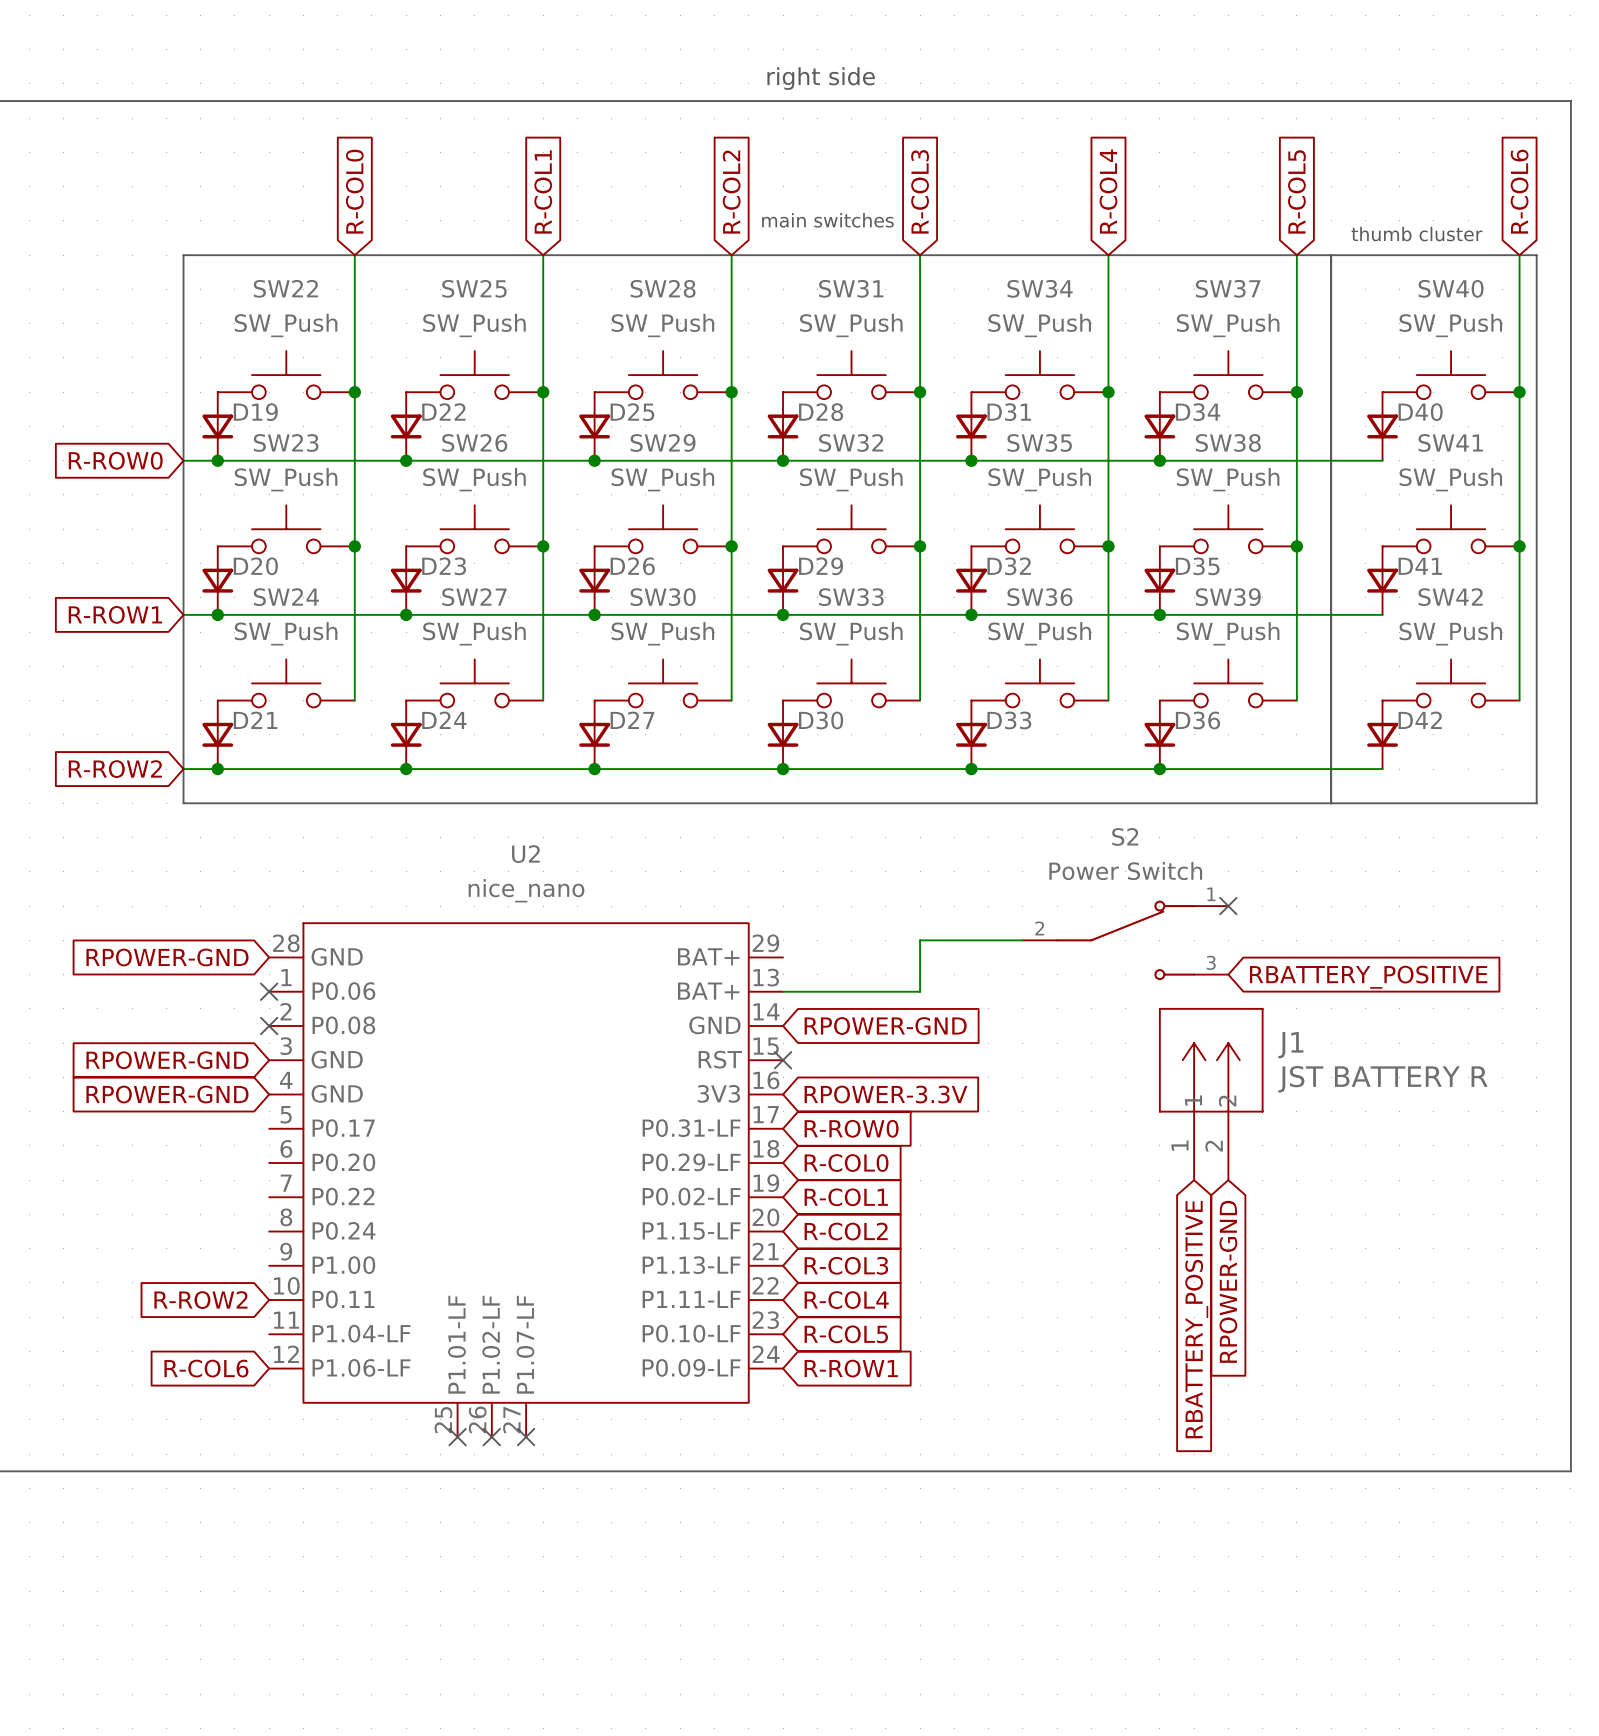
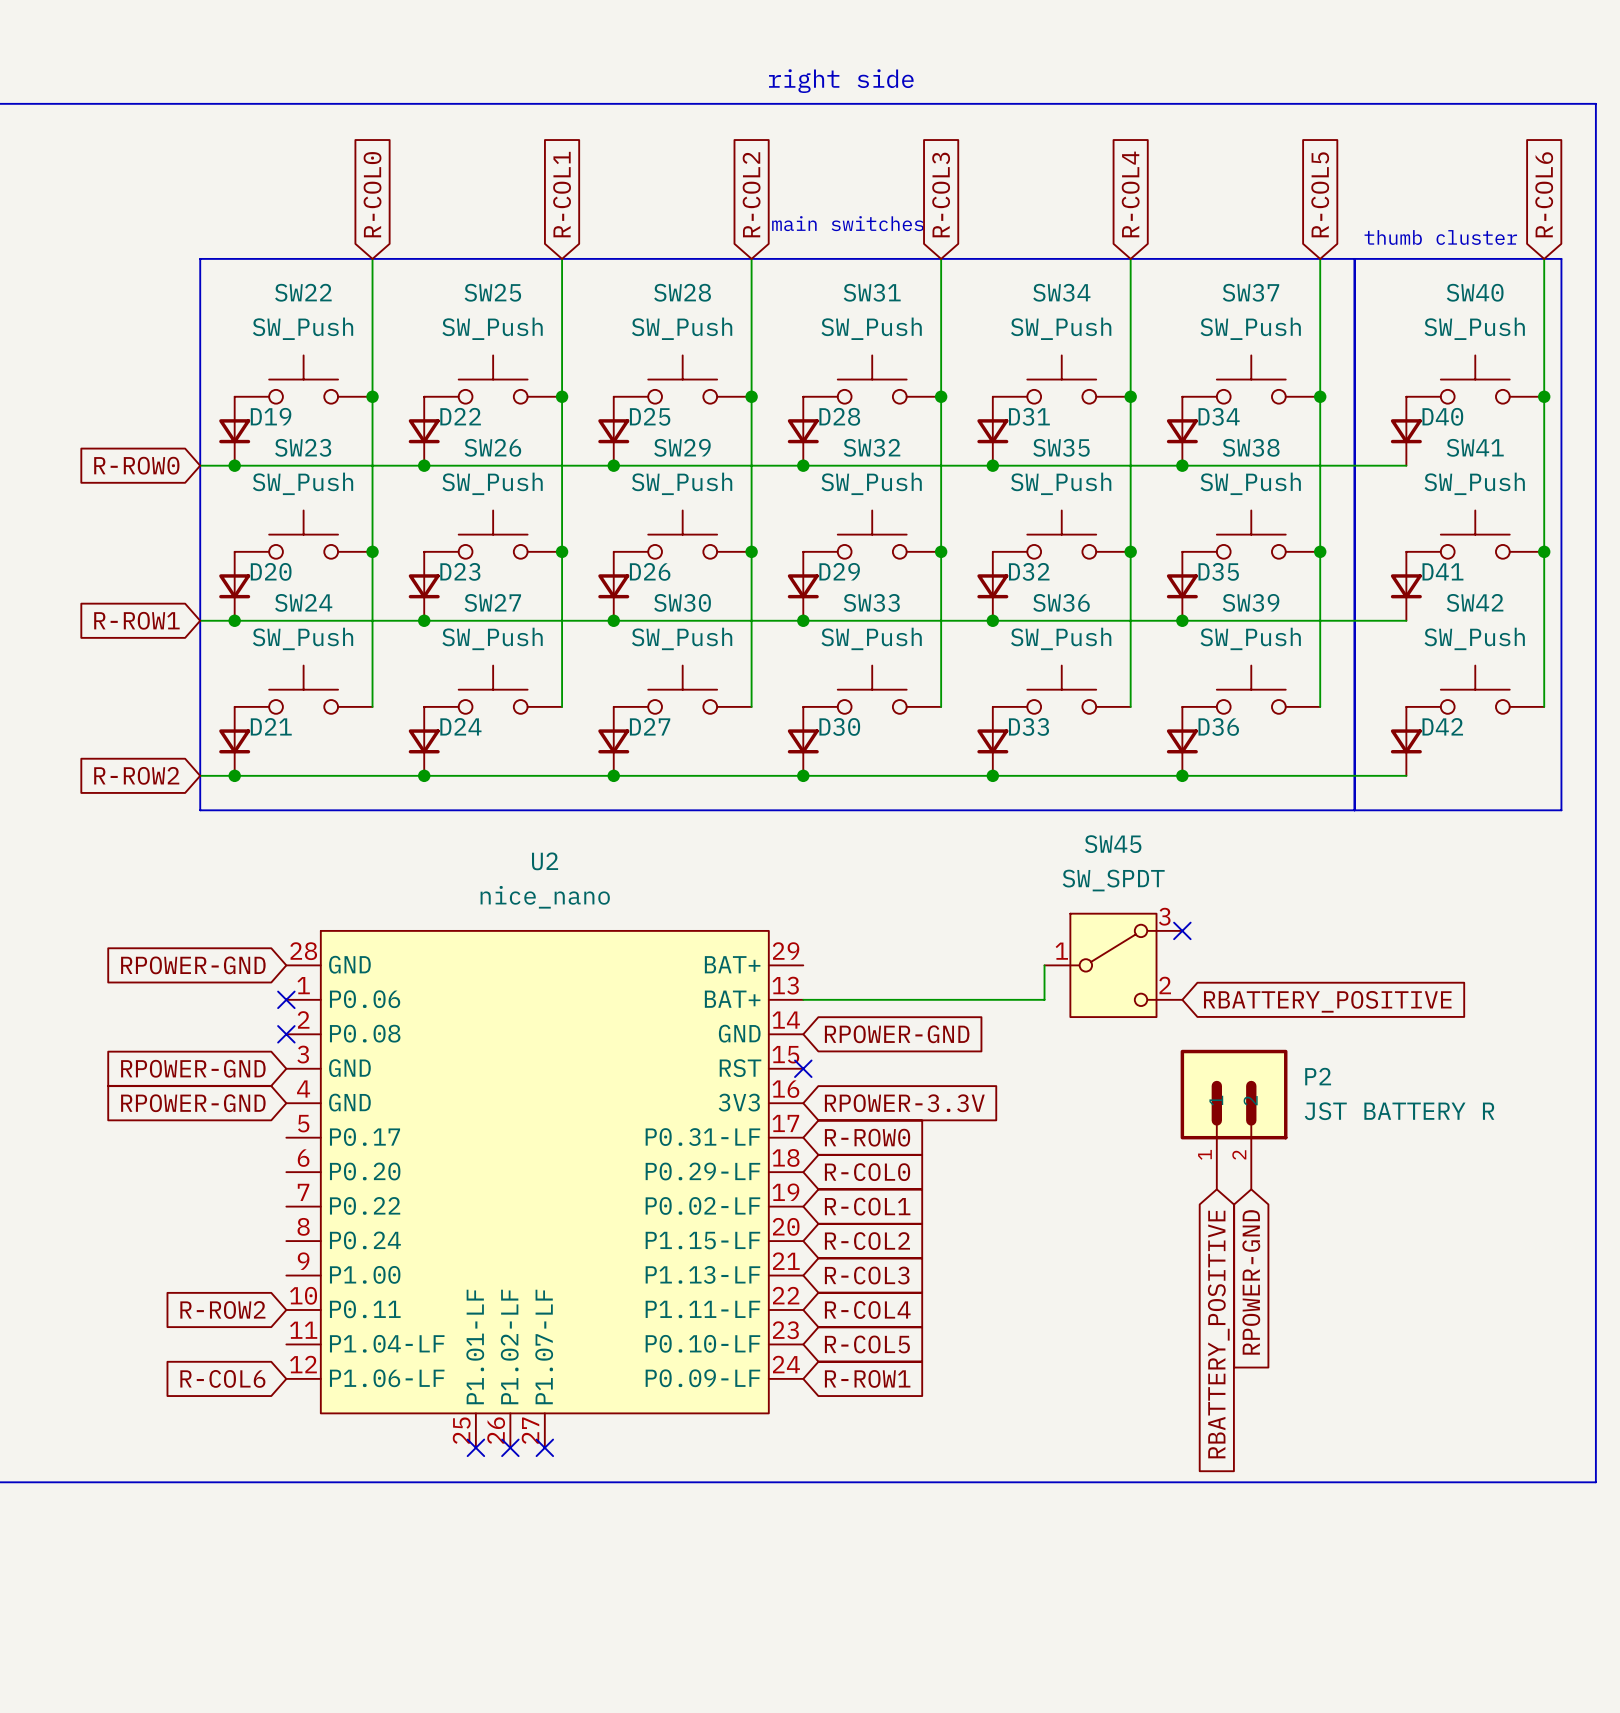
no-connect mark position: (1228, 906) -> (1182, 930)
wire: (1022, 940) (920, 940) (920, 991) -> (1044, 965) (1044, 999) (941, 999)
S2: Power Switch (1125, 940) -> none
SW45: none -> SW_SPDT (1113, 965)
global label position: RBATTERY_POSITIVE (1368, 977) -> RBATTERY_POSITIVE (1327, 1001)
J1: JST BATTERY R (1211, 1094) -> none
P2: none -> JST BATTERY R (1234, 1119)

